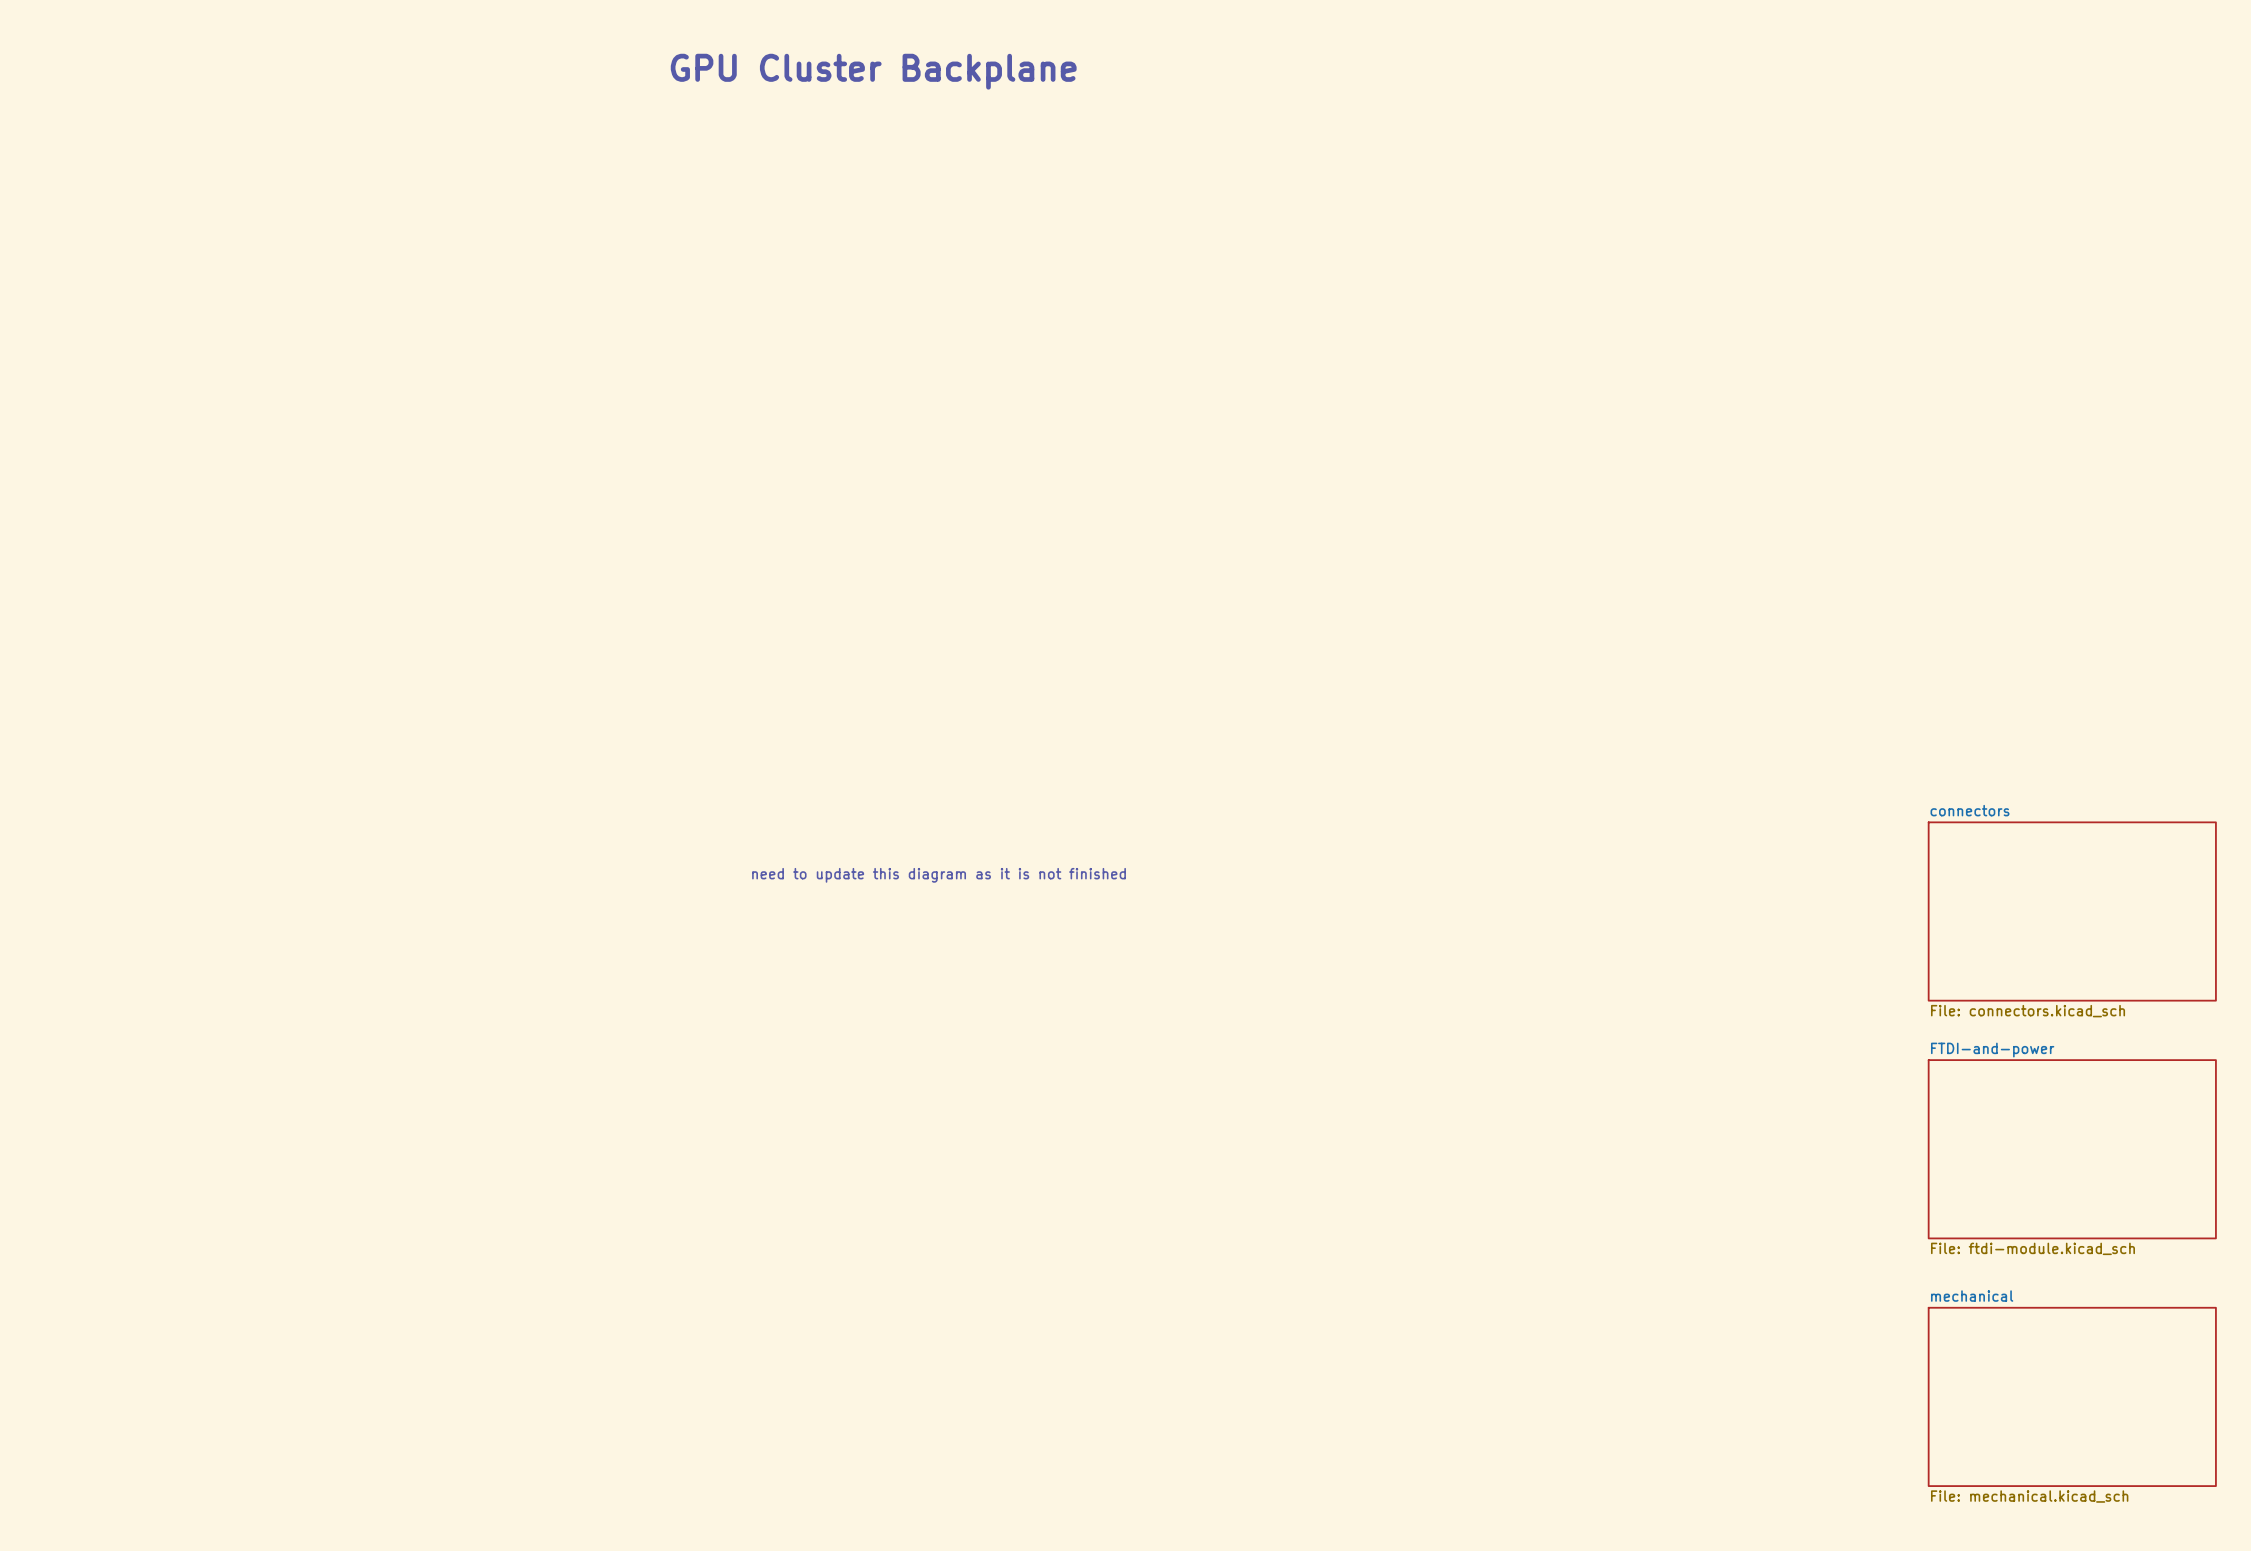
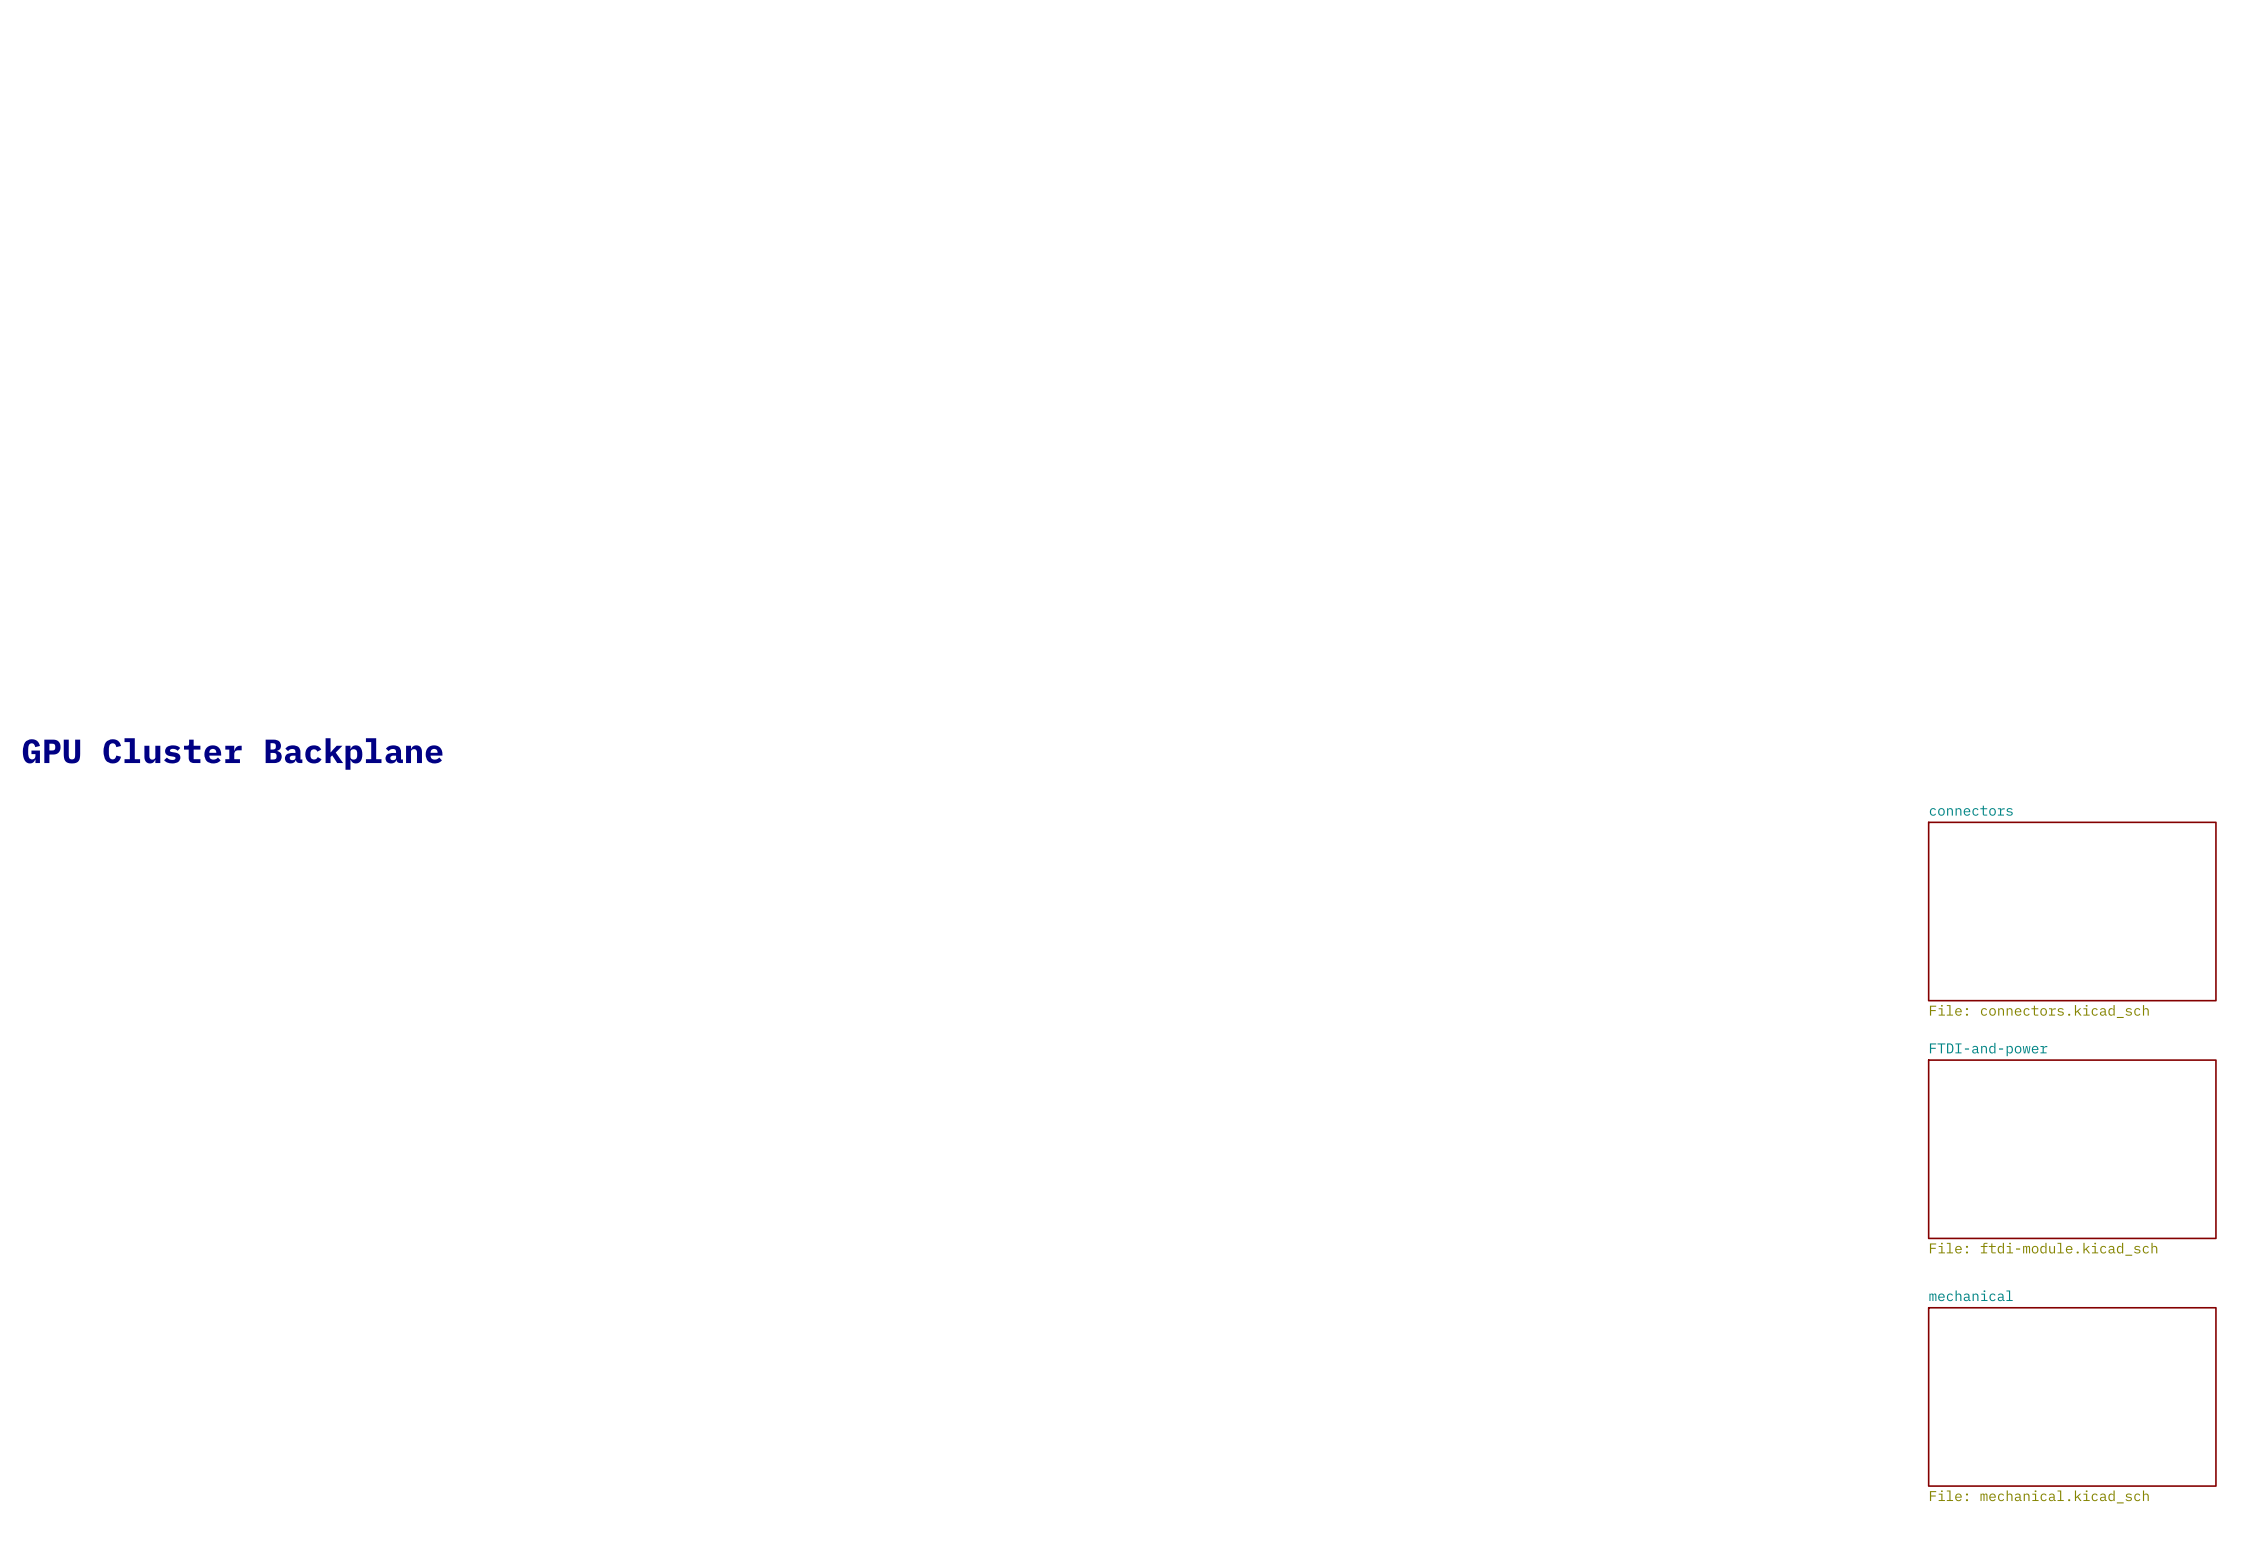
text: GPU Cluster Backplane (873, 71) -> none
text: none -> GPU Cluster Backplane (232, 753)
text: need to update this diagram as it is not finished (939, 875) -> none

